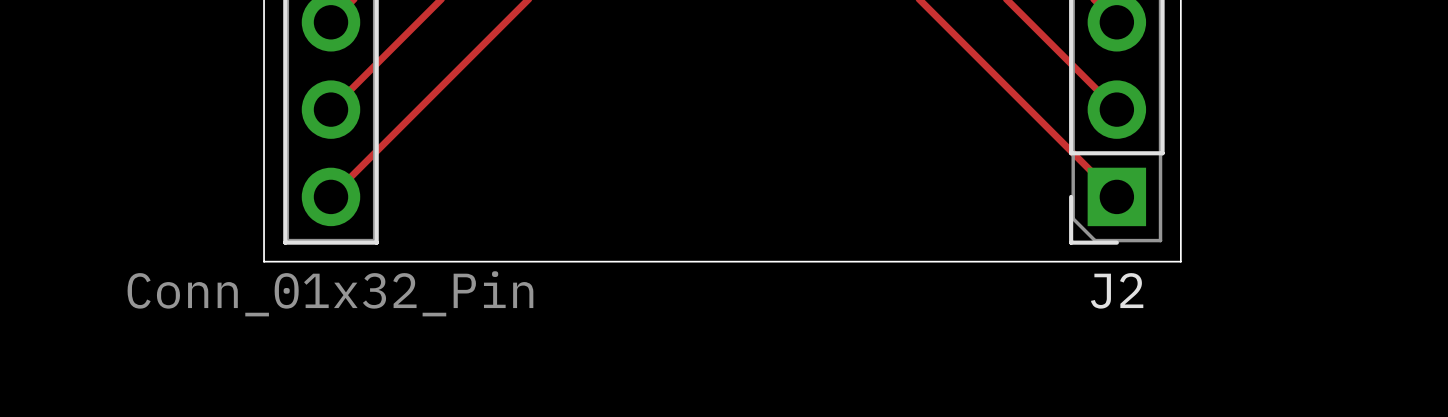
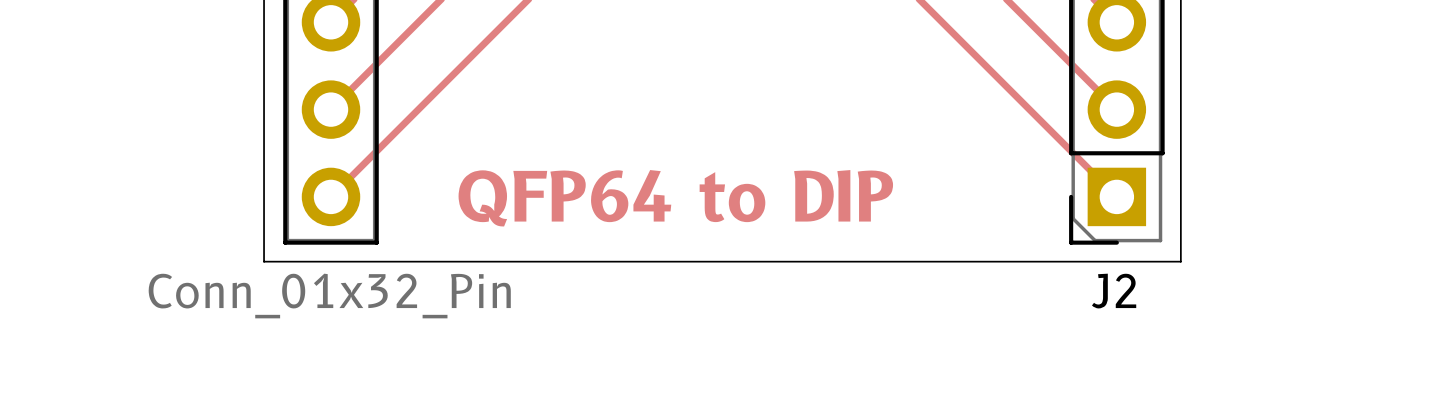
text: none -> QFP64 to DIP (675, 198)

